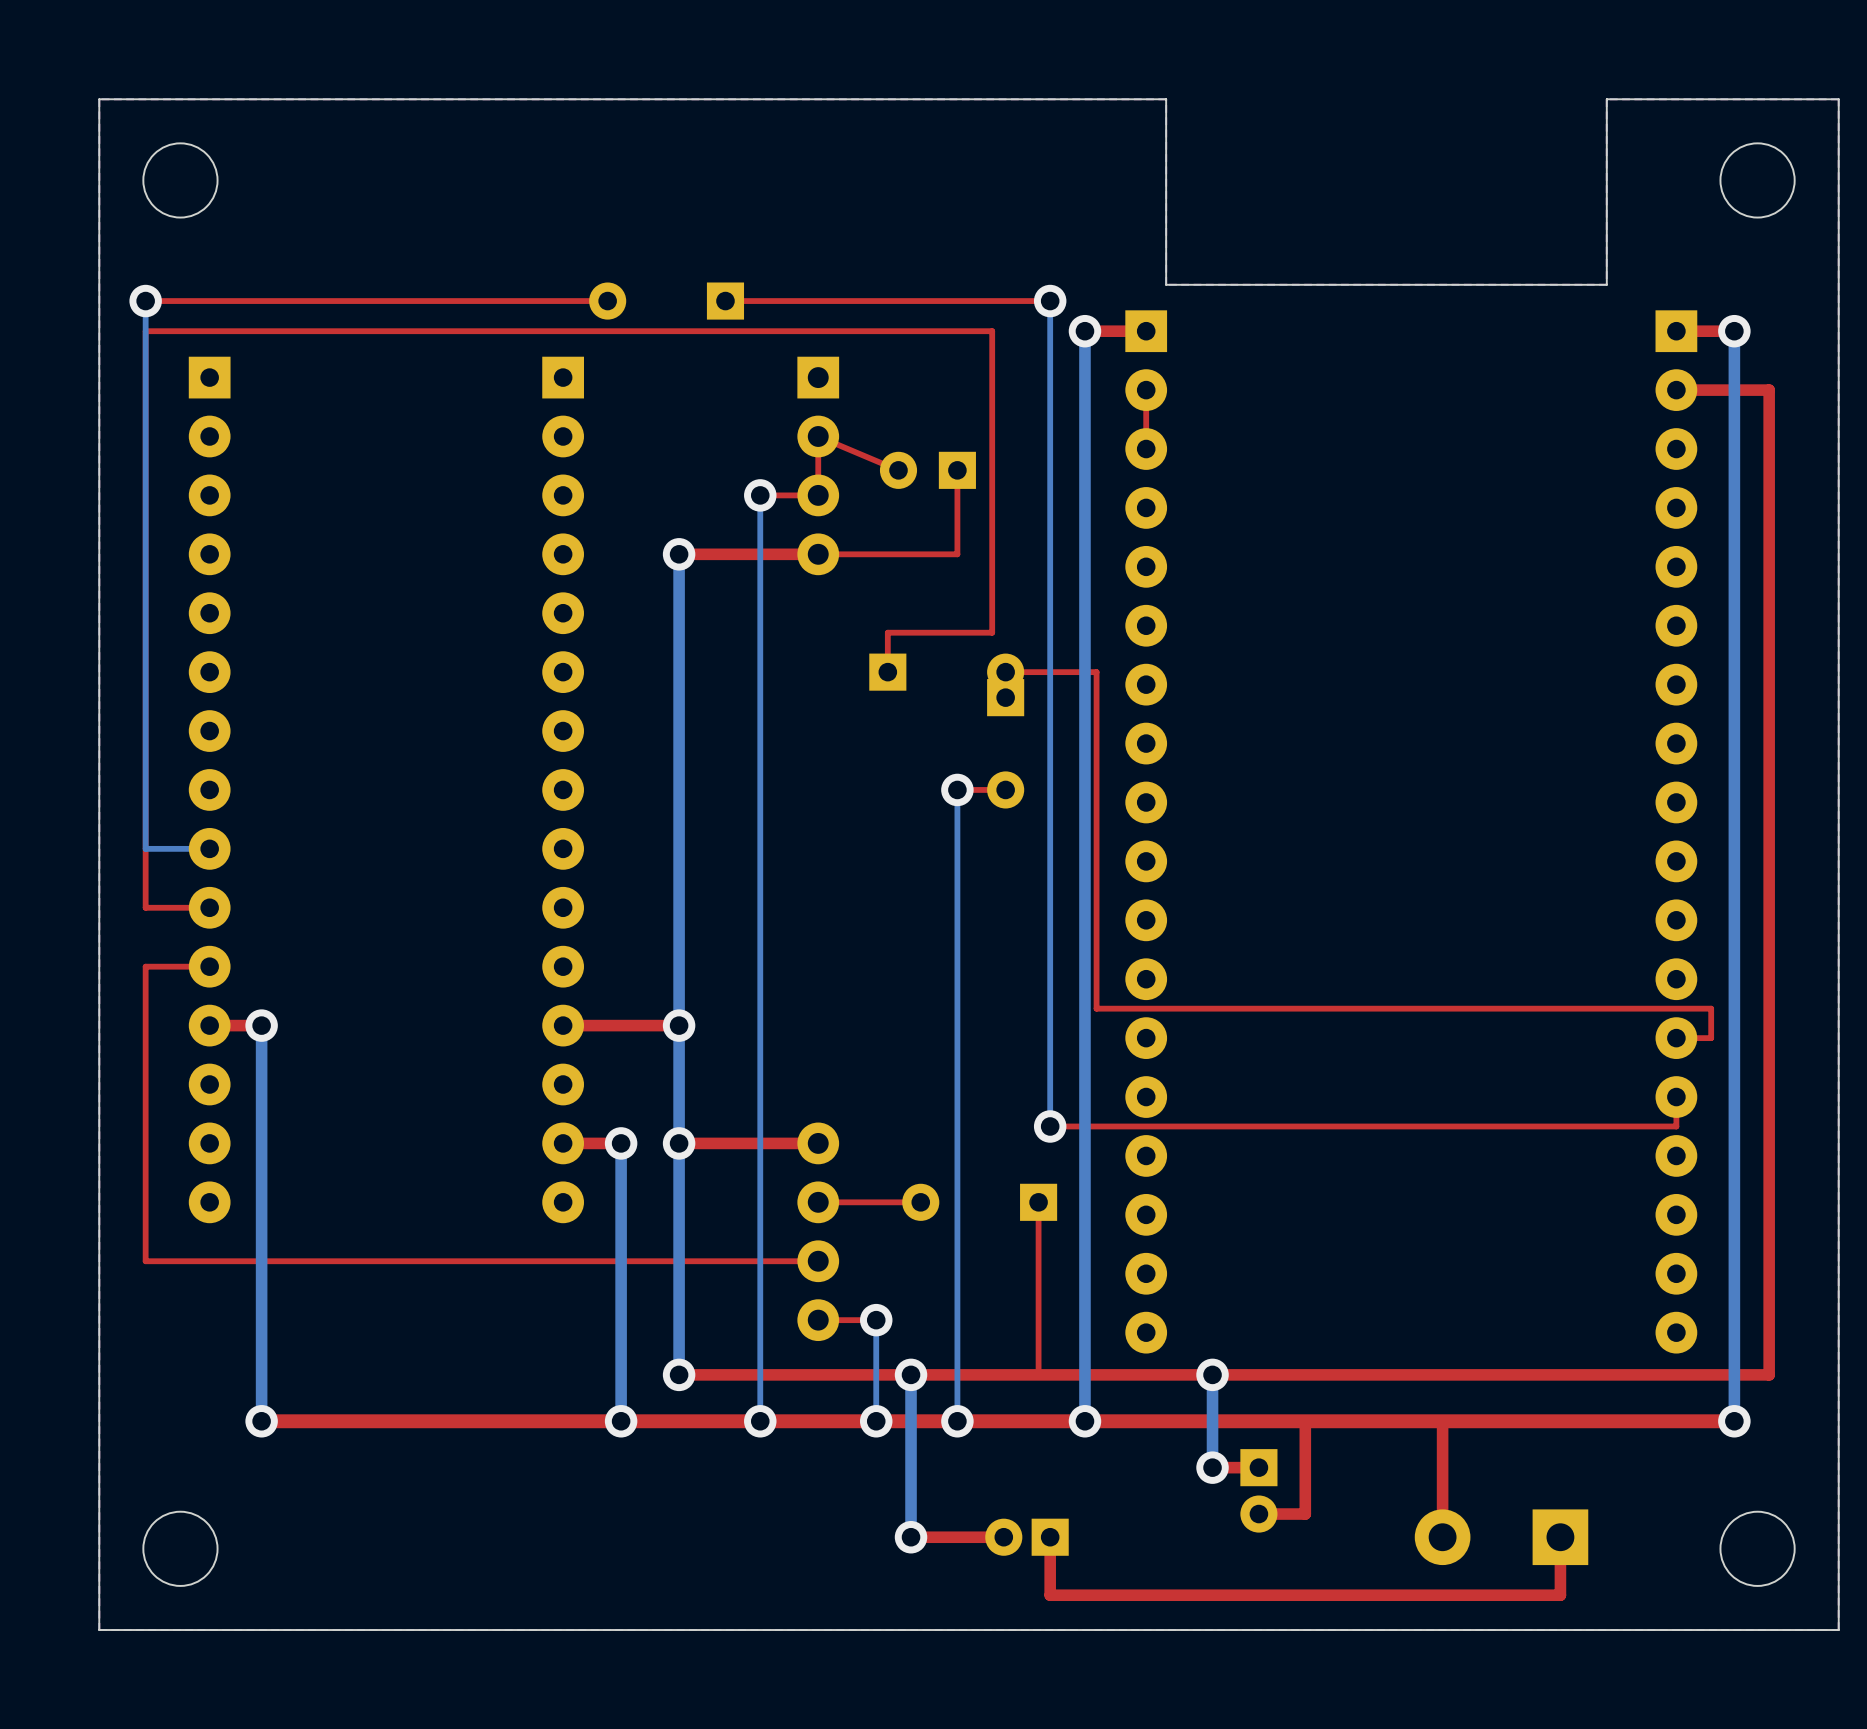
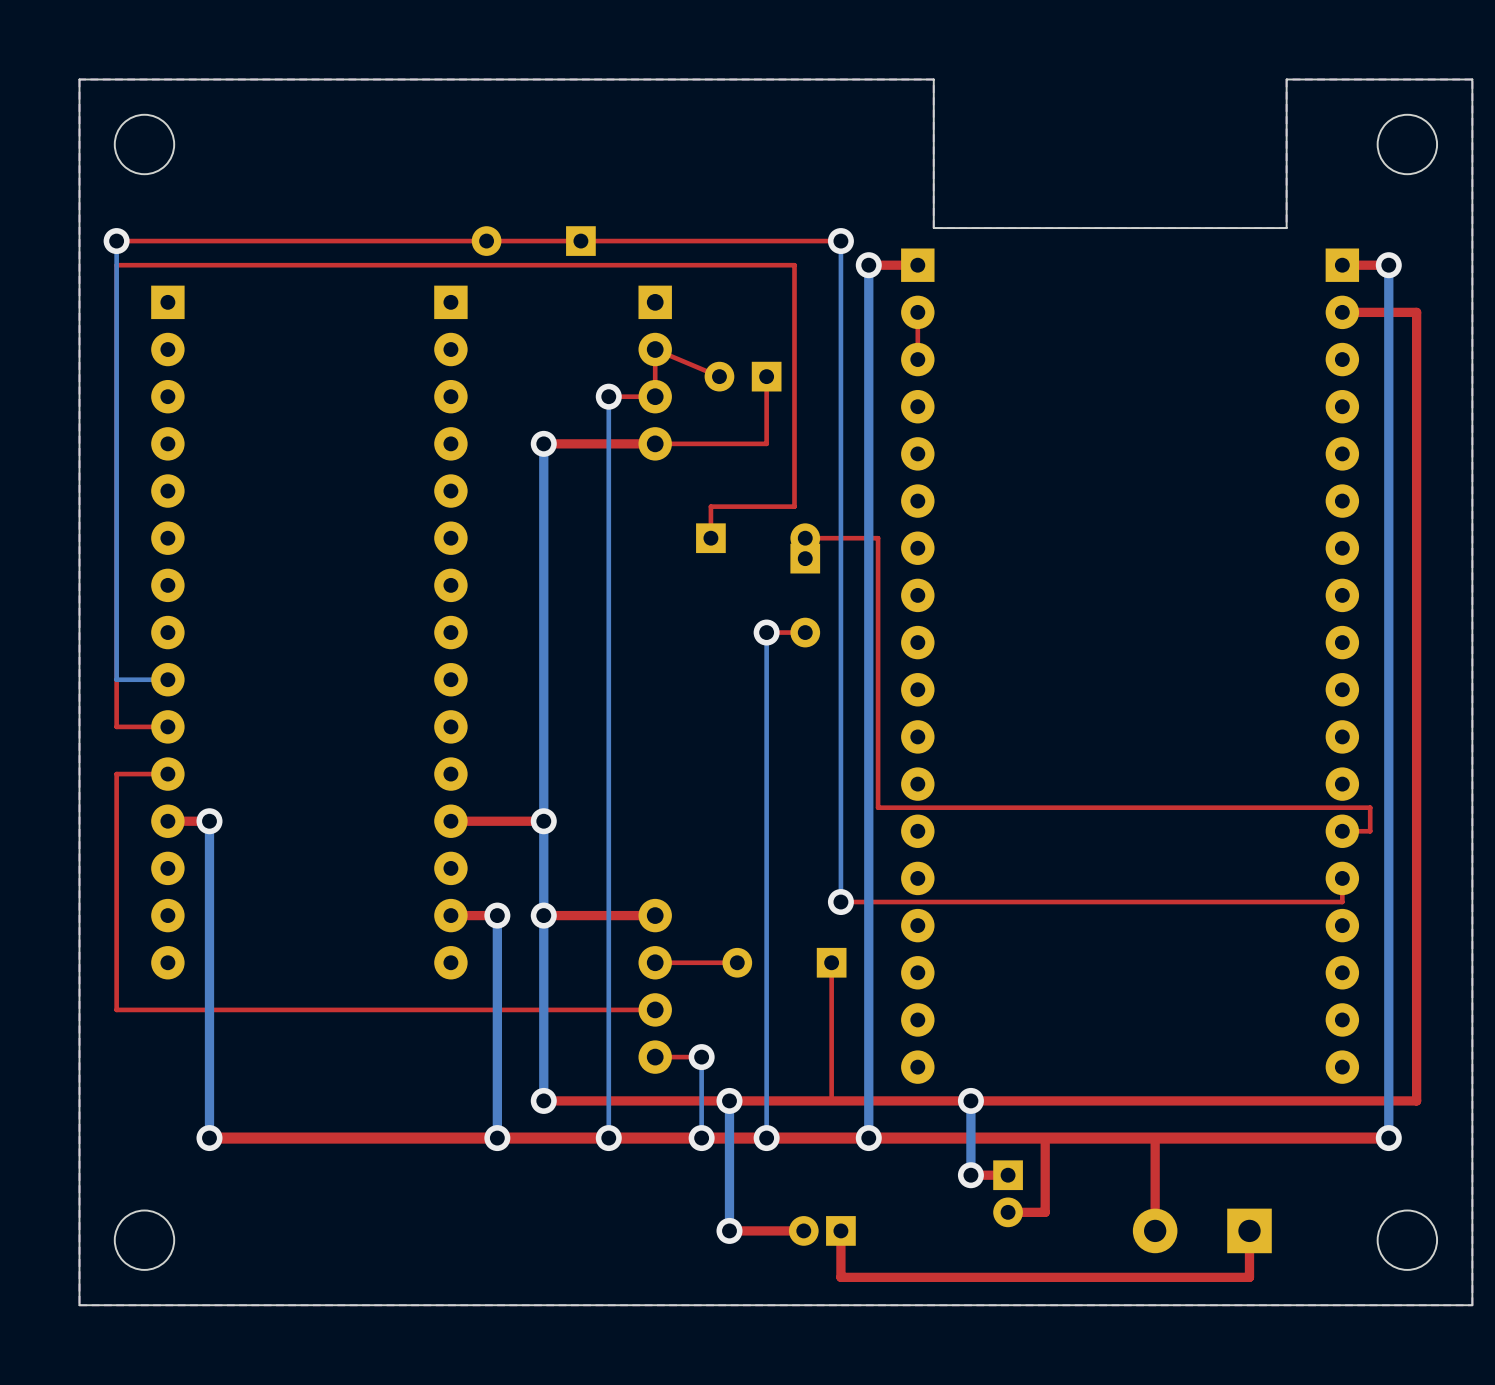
top track: none -> (580, 241) (486, 241)

